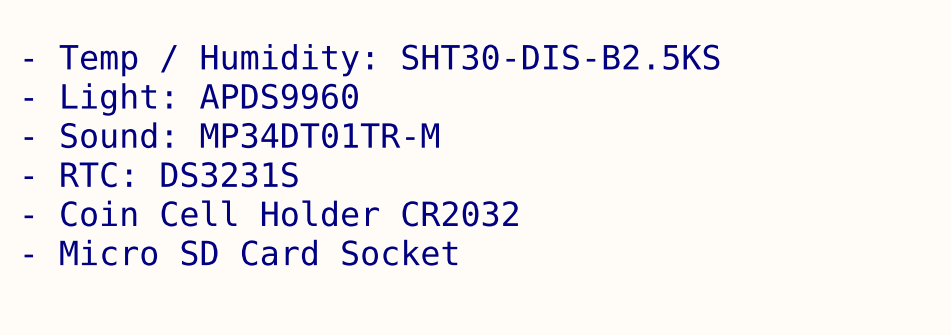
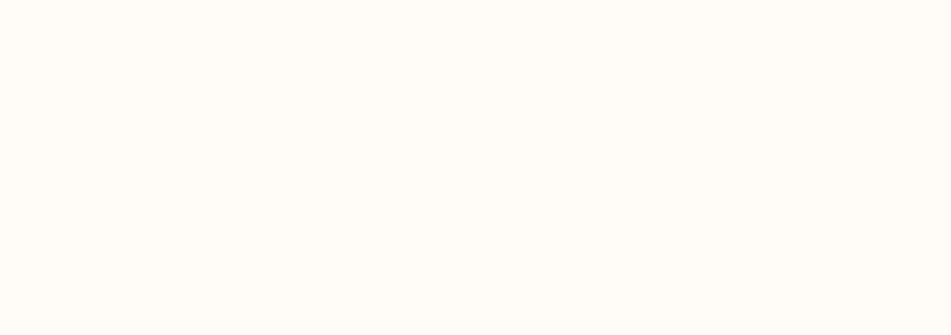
text: - Temp / Humidity: SHT30-DIS-B2.5KS (371, 60) -> none
text: - Light: APDS9960 (191, 99) -> none
text: - Sound: MP34DT01TR-M (231, 135) -> none
text: - RTC: DS3231S (161, 174) -> none
text: - Coin Cell Holder CR2032 (271, 213) -> none
text: - Micro SD Card Socket (240, 252) -> none

